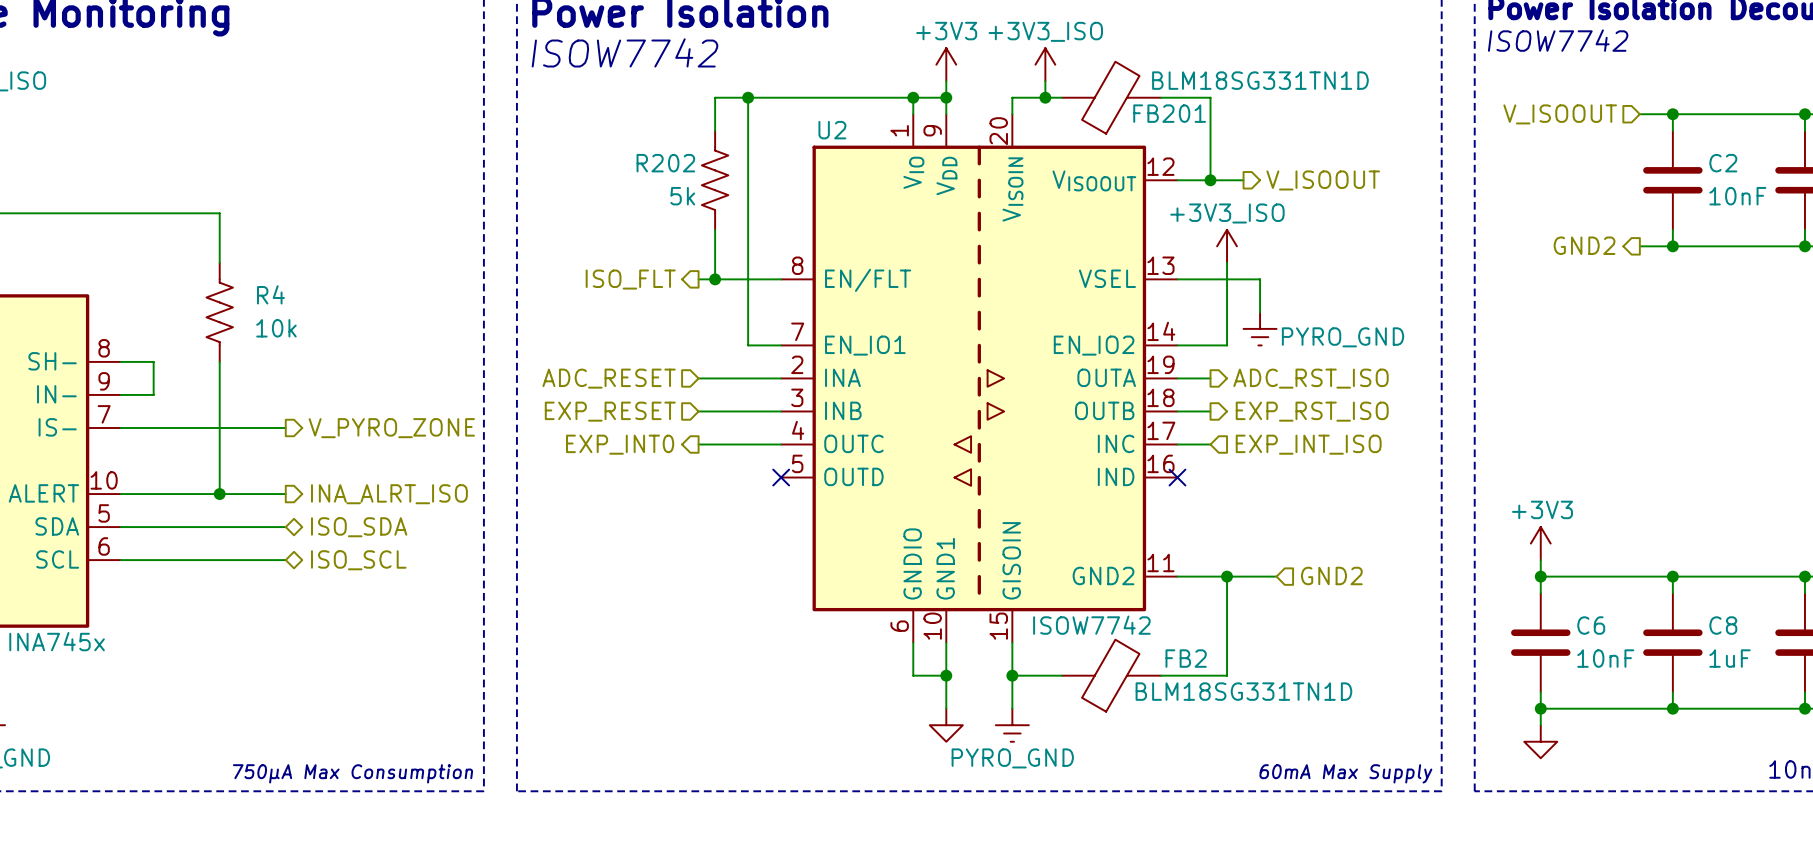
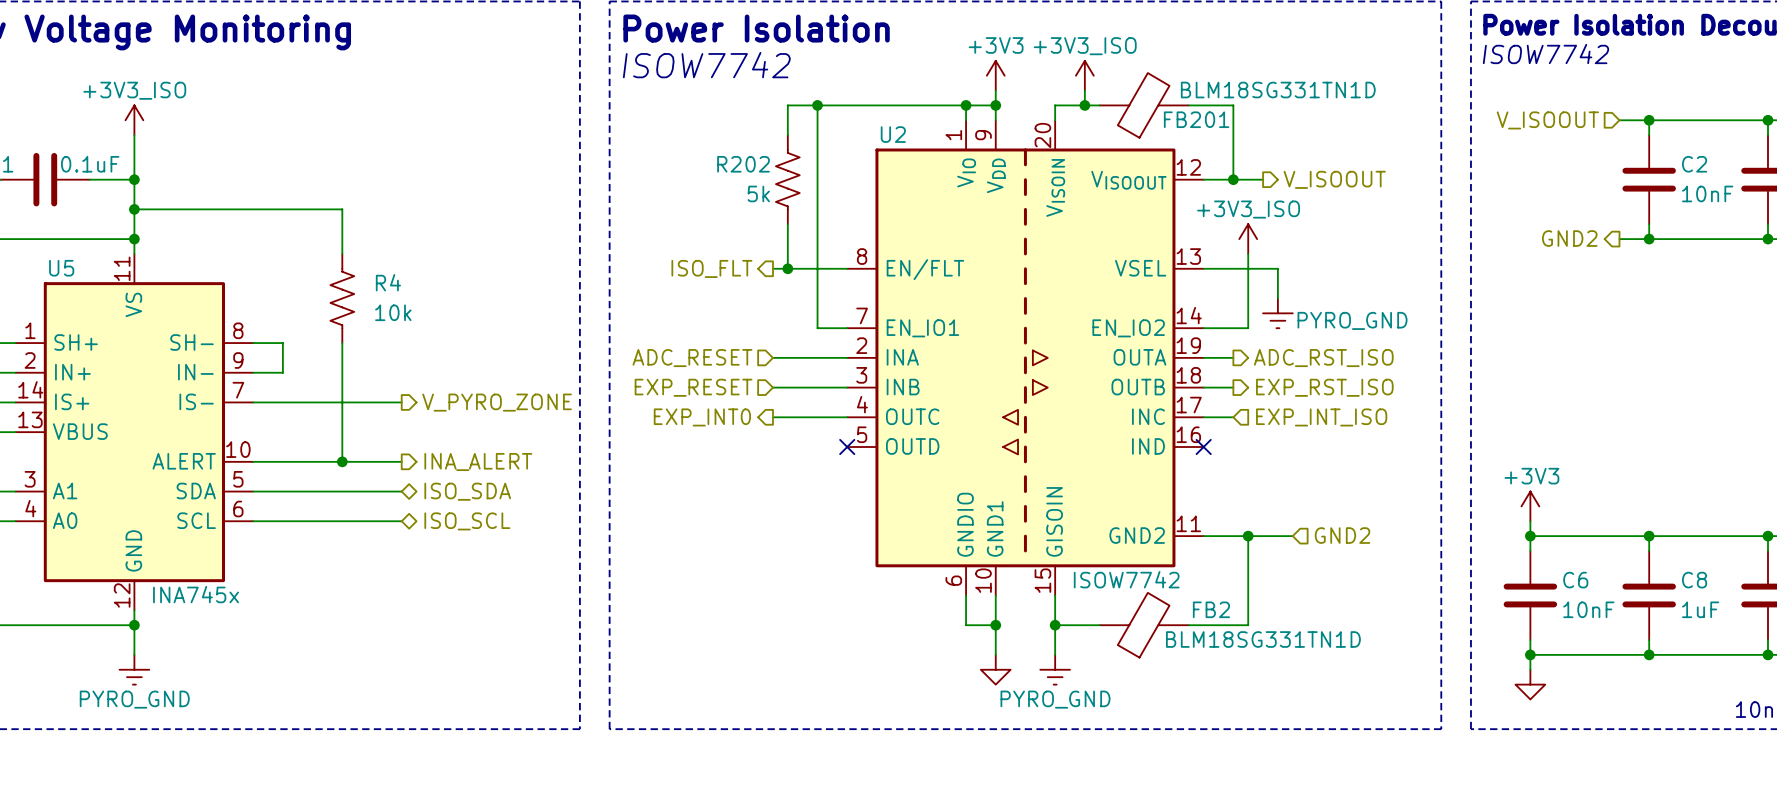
hierarchical label: INA_ALRT_ISO (389, 494) -> INA_ALERT (478, 462)
text: 750µA Max Consumption (353, 773) -> none
text: 60mA Max Supply (1345, 773) -> none

